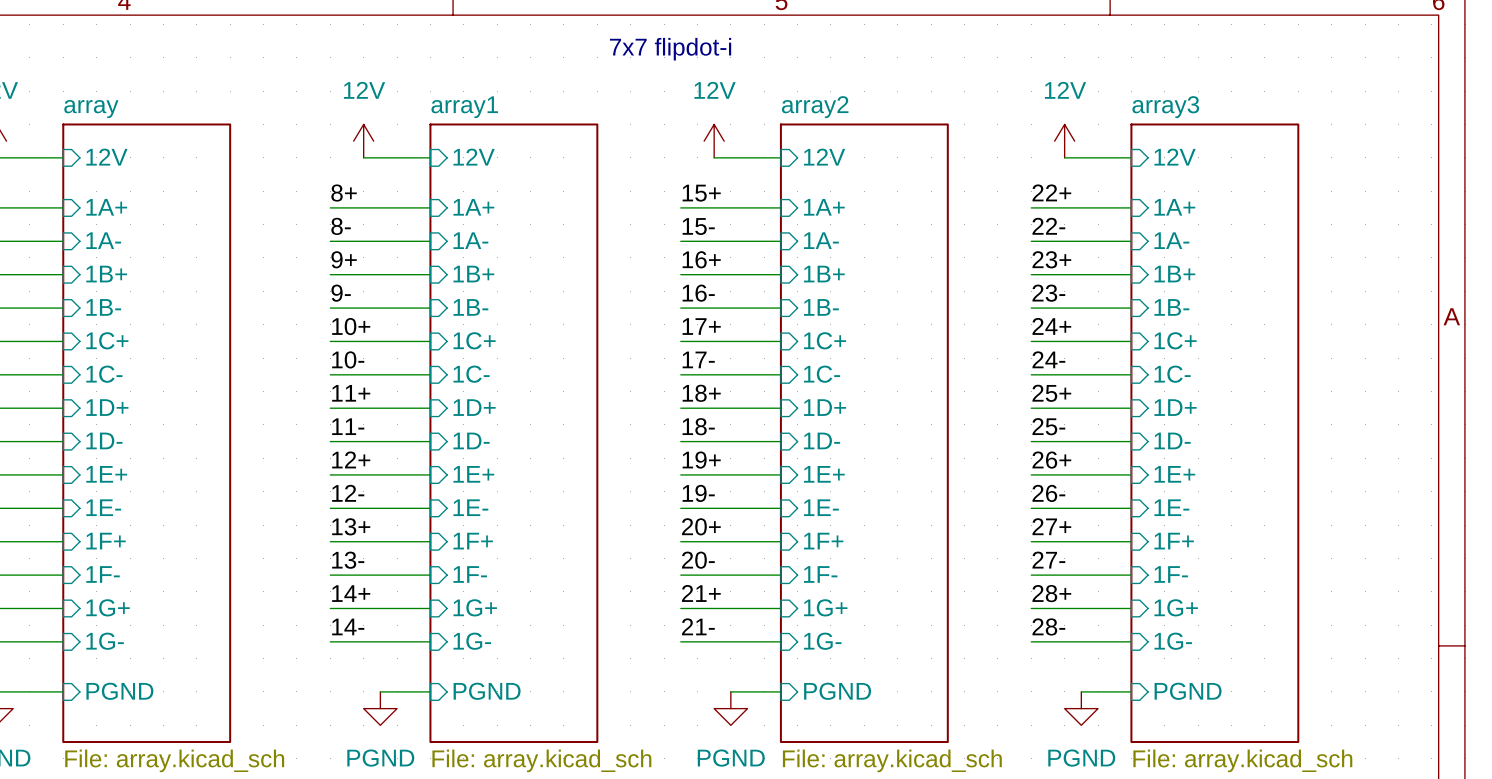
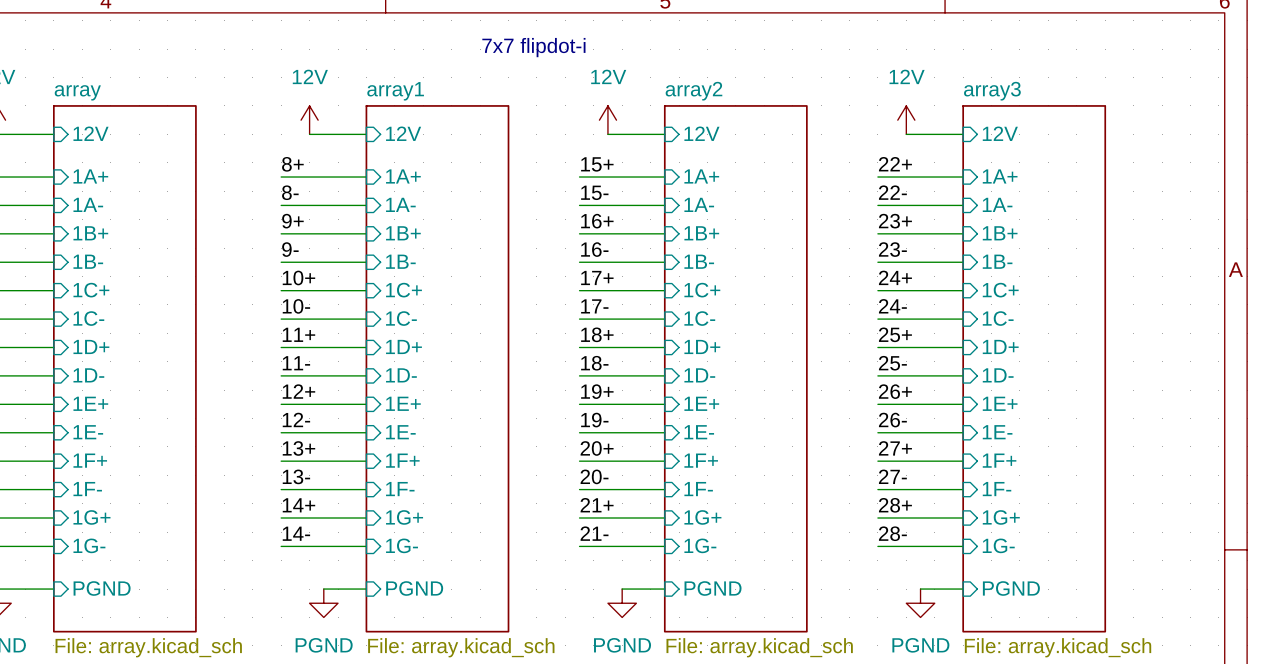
text position: 7x7 flipdot-i (670, 49) -> 7x7 flipdot-i (533, 47)

